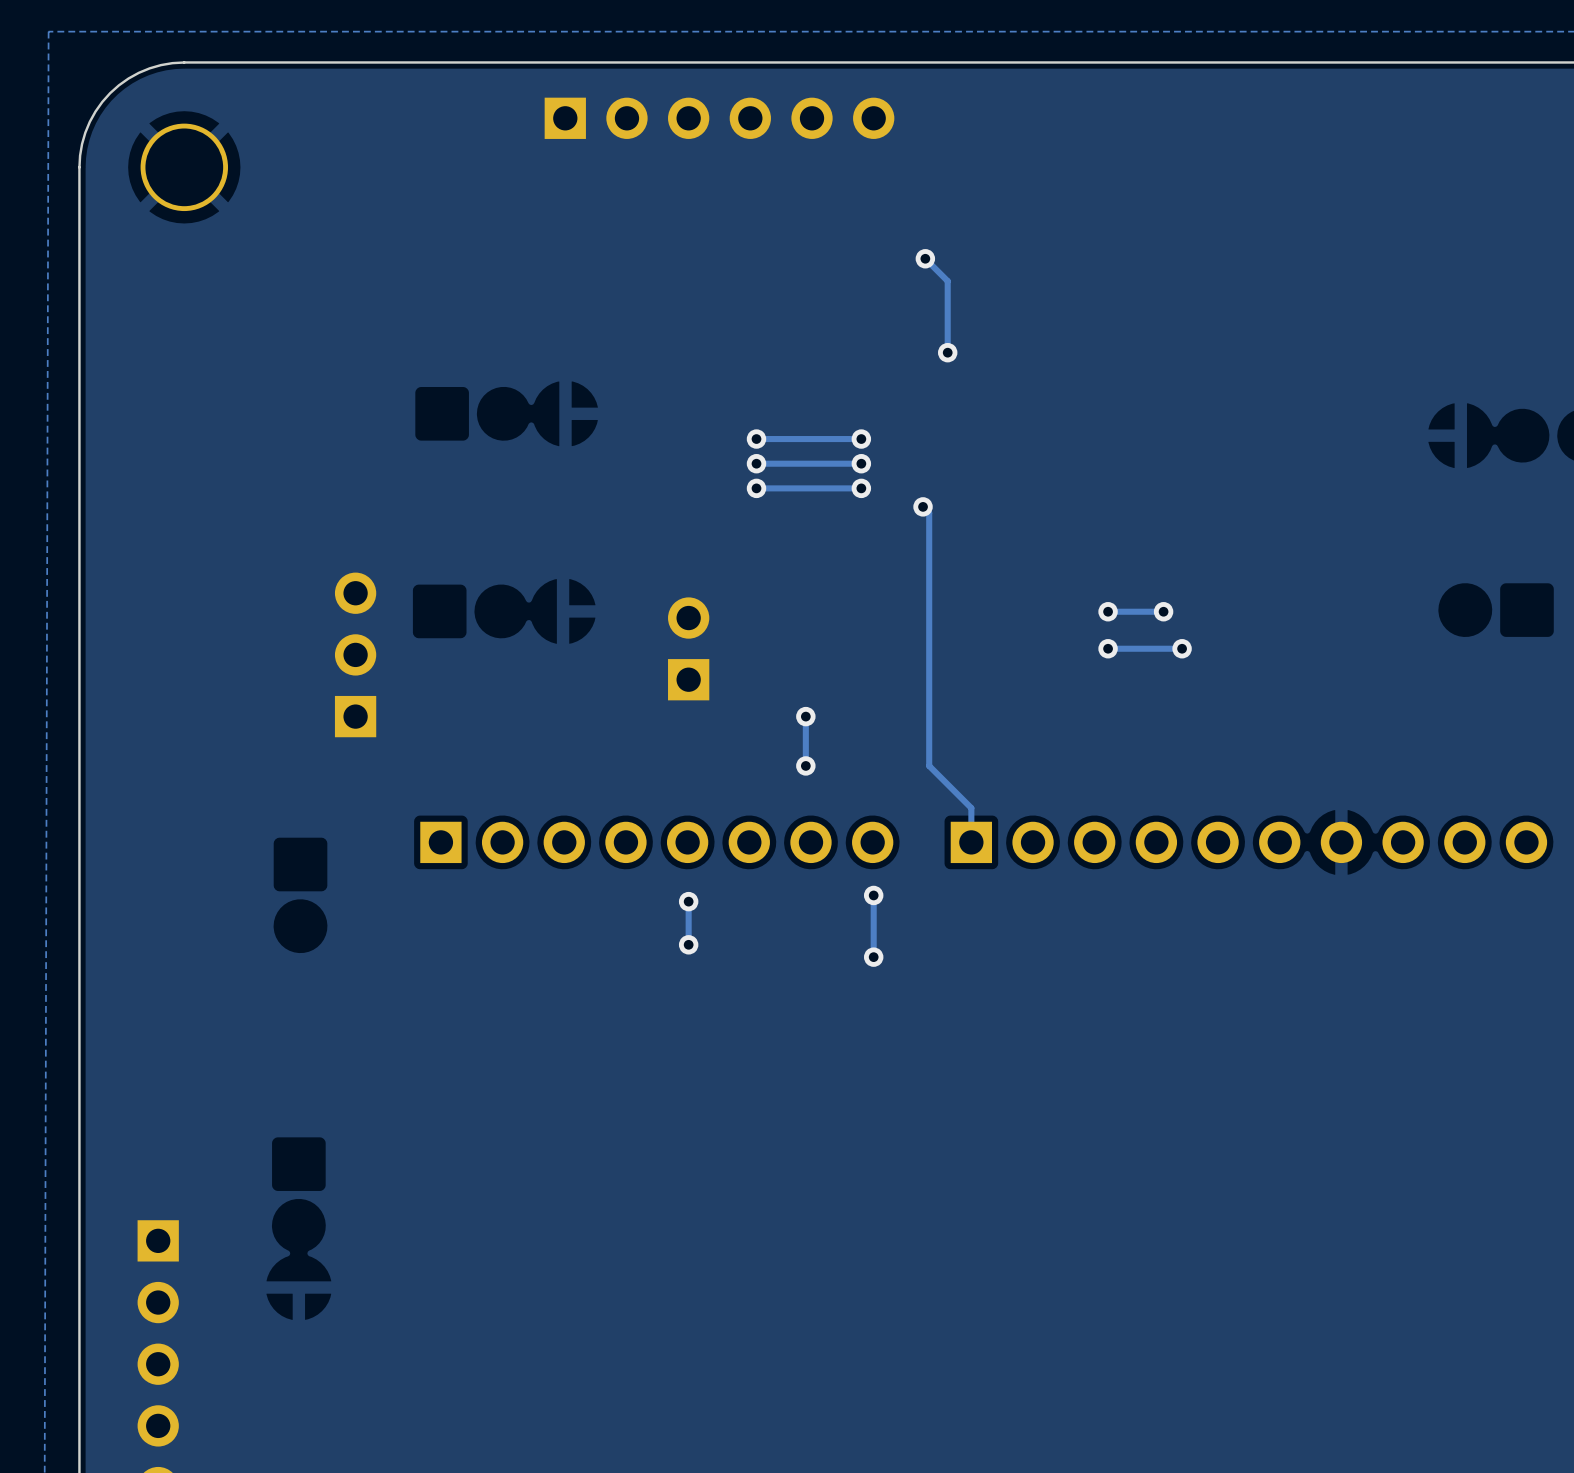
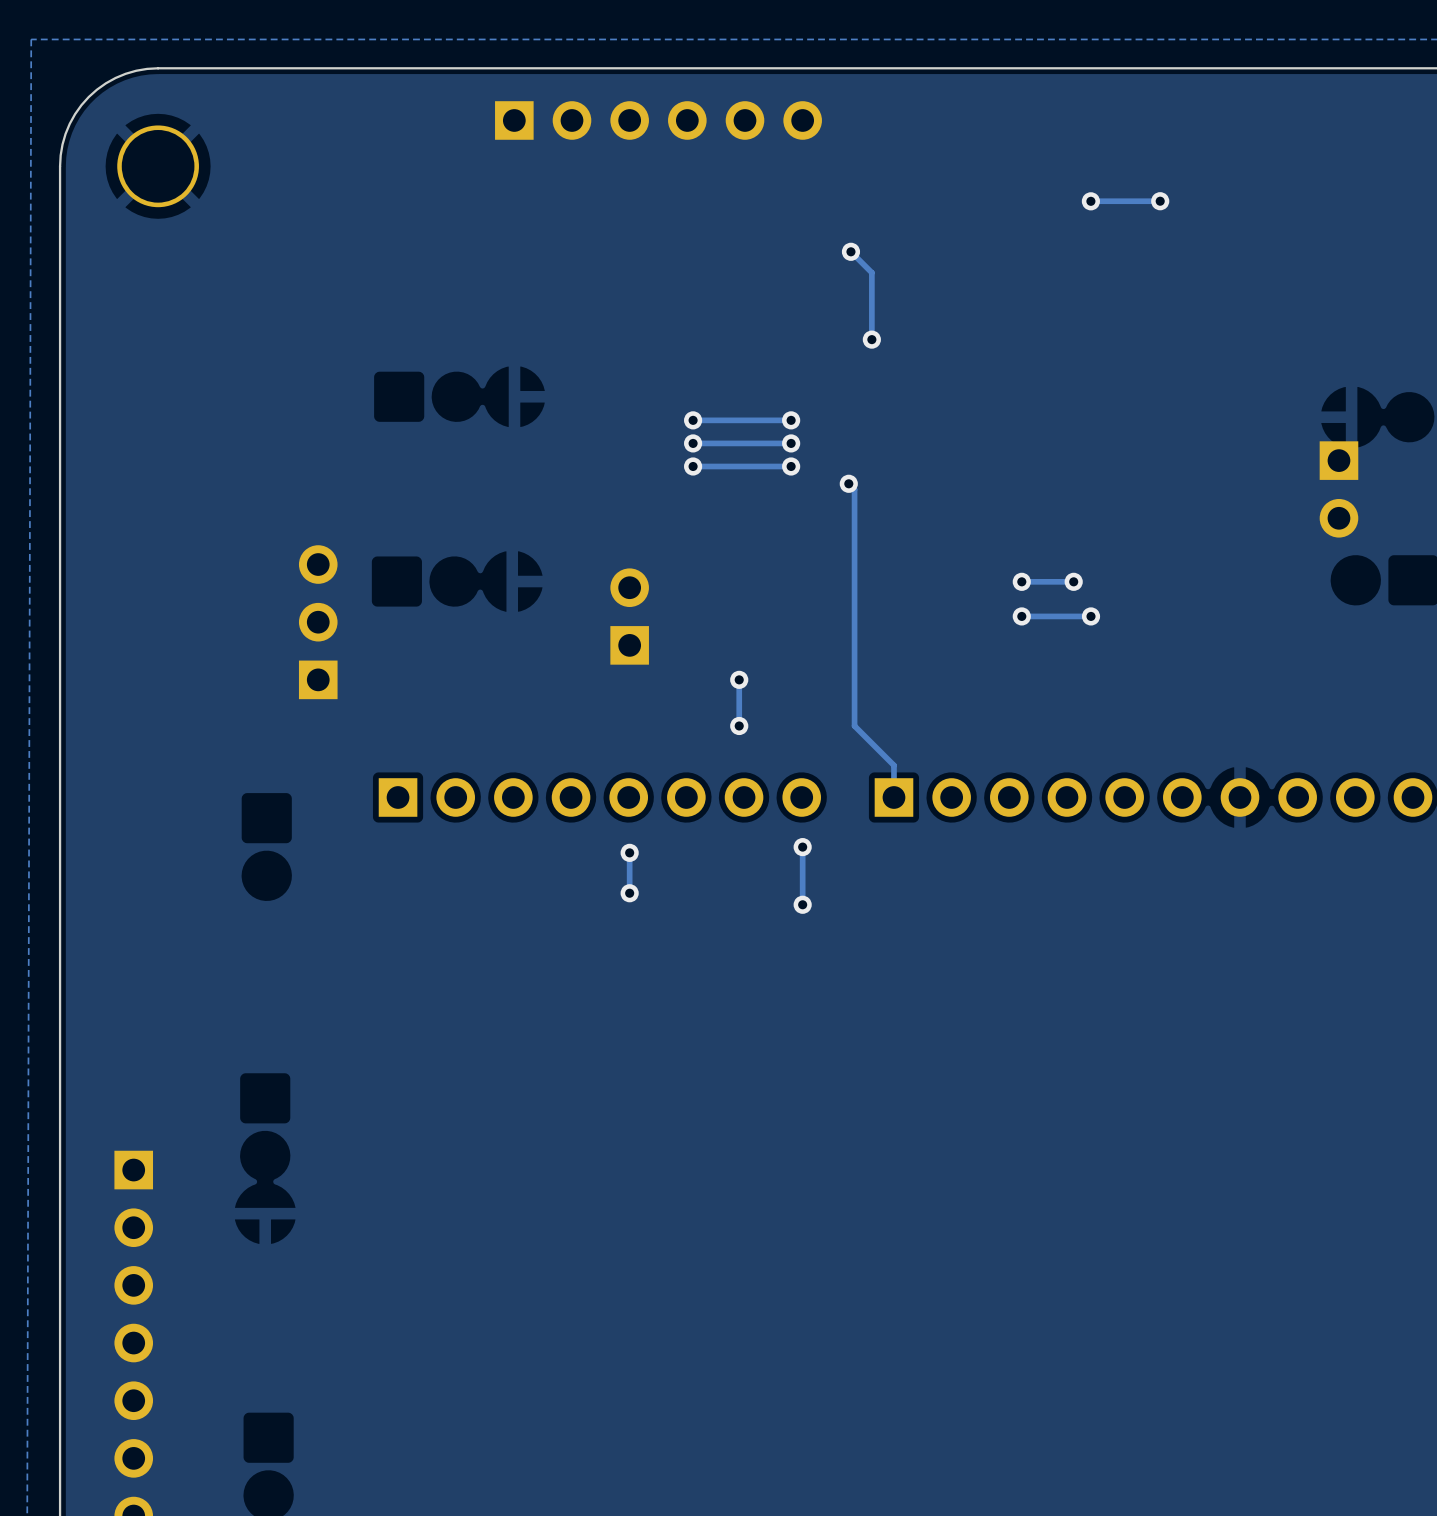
via: none -> (1090, 201)
track: none -> (1160, 201) (1091, 201)
via: none -> (1160, 201)
part: none -> (1338, 489)

